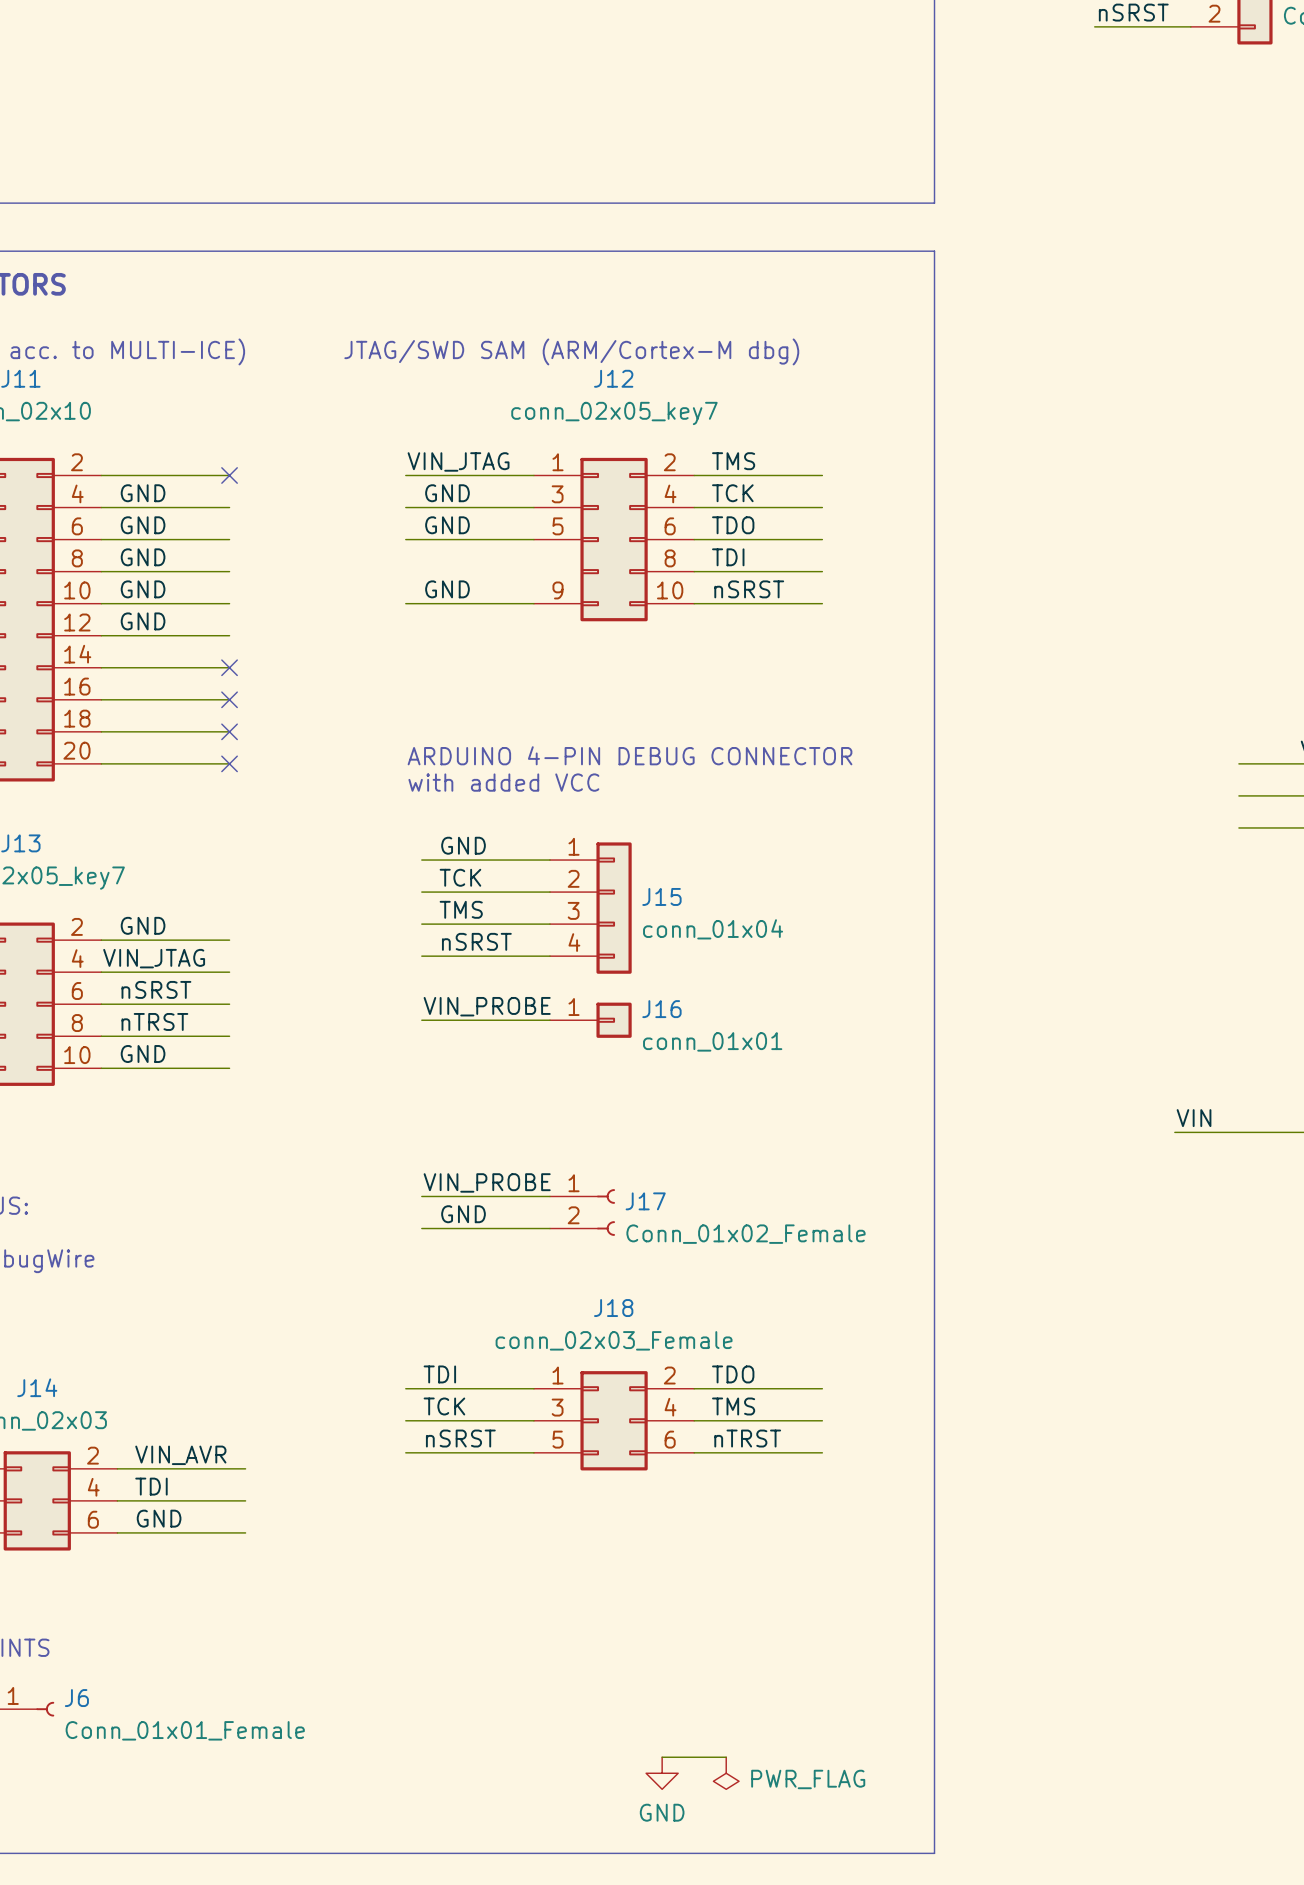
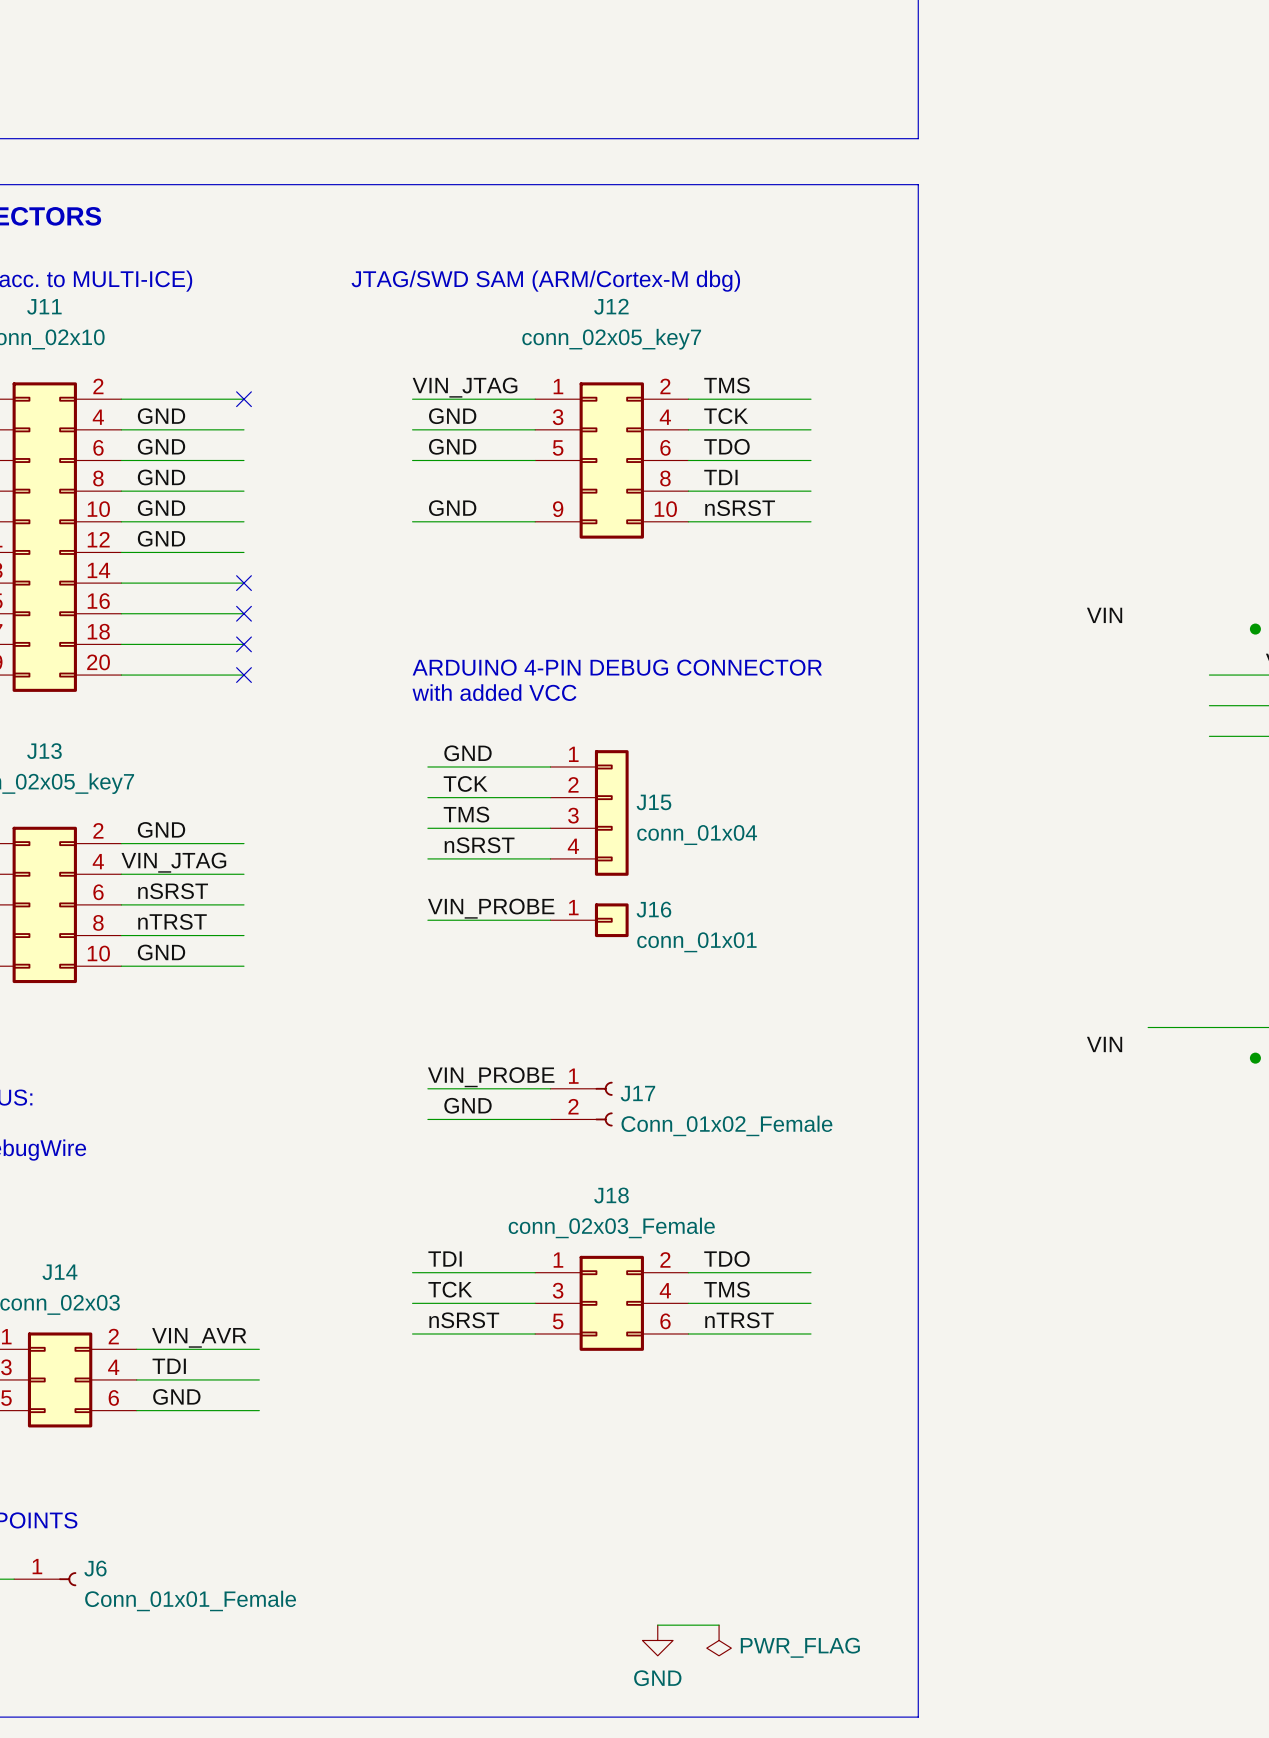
label: none -> VIN (1104, 615)
junction: none -> (1255, 629)
label position: VIN (1194, 1118) -> VIN (1104, 1044)
junction: none -> (1255, 1058)

